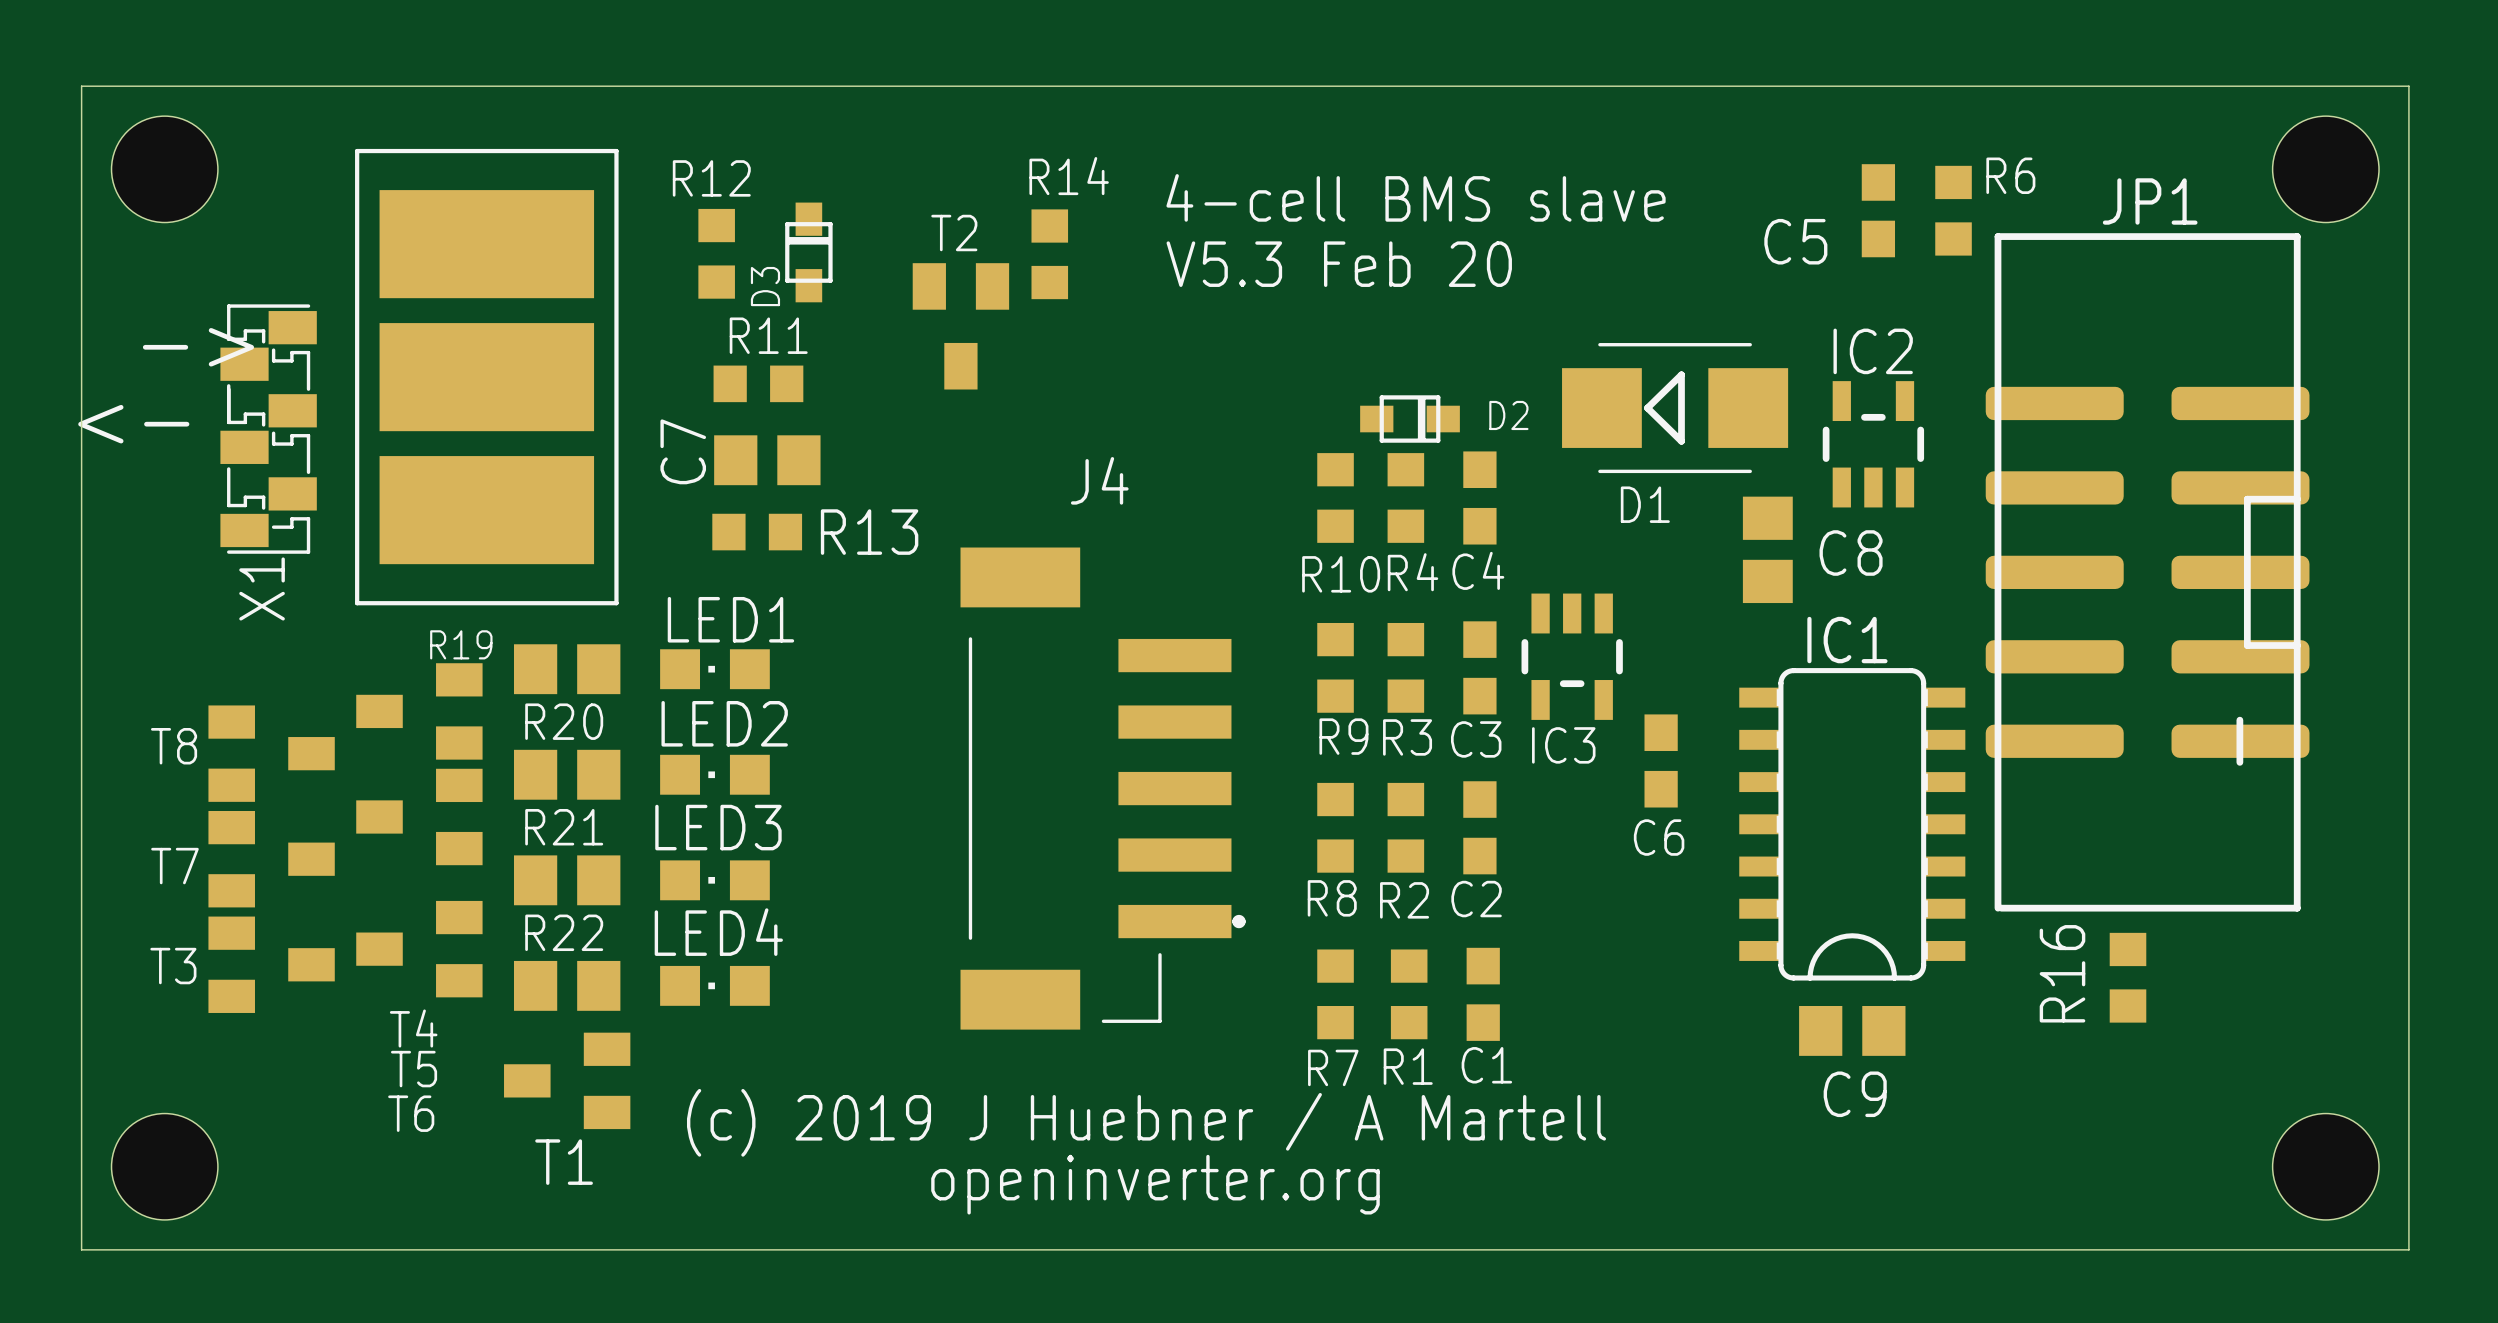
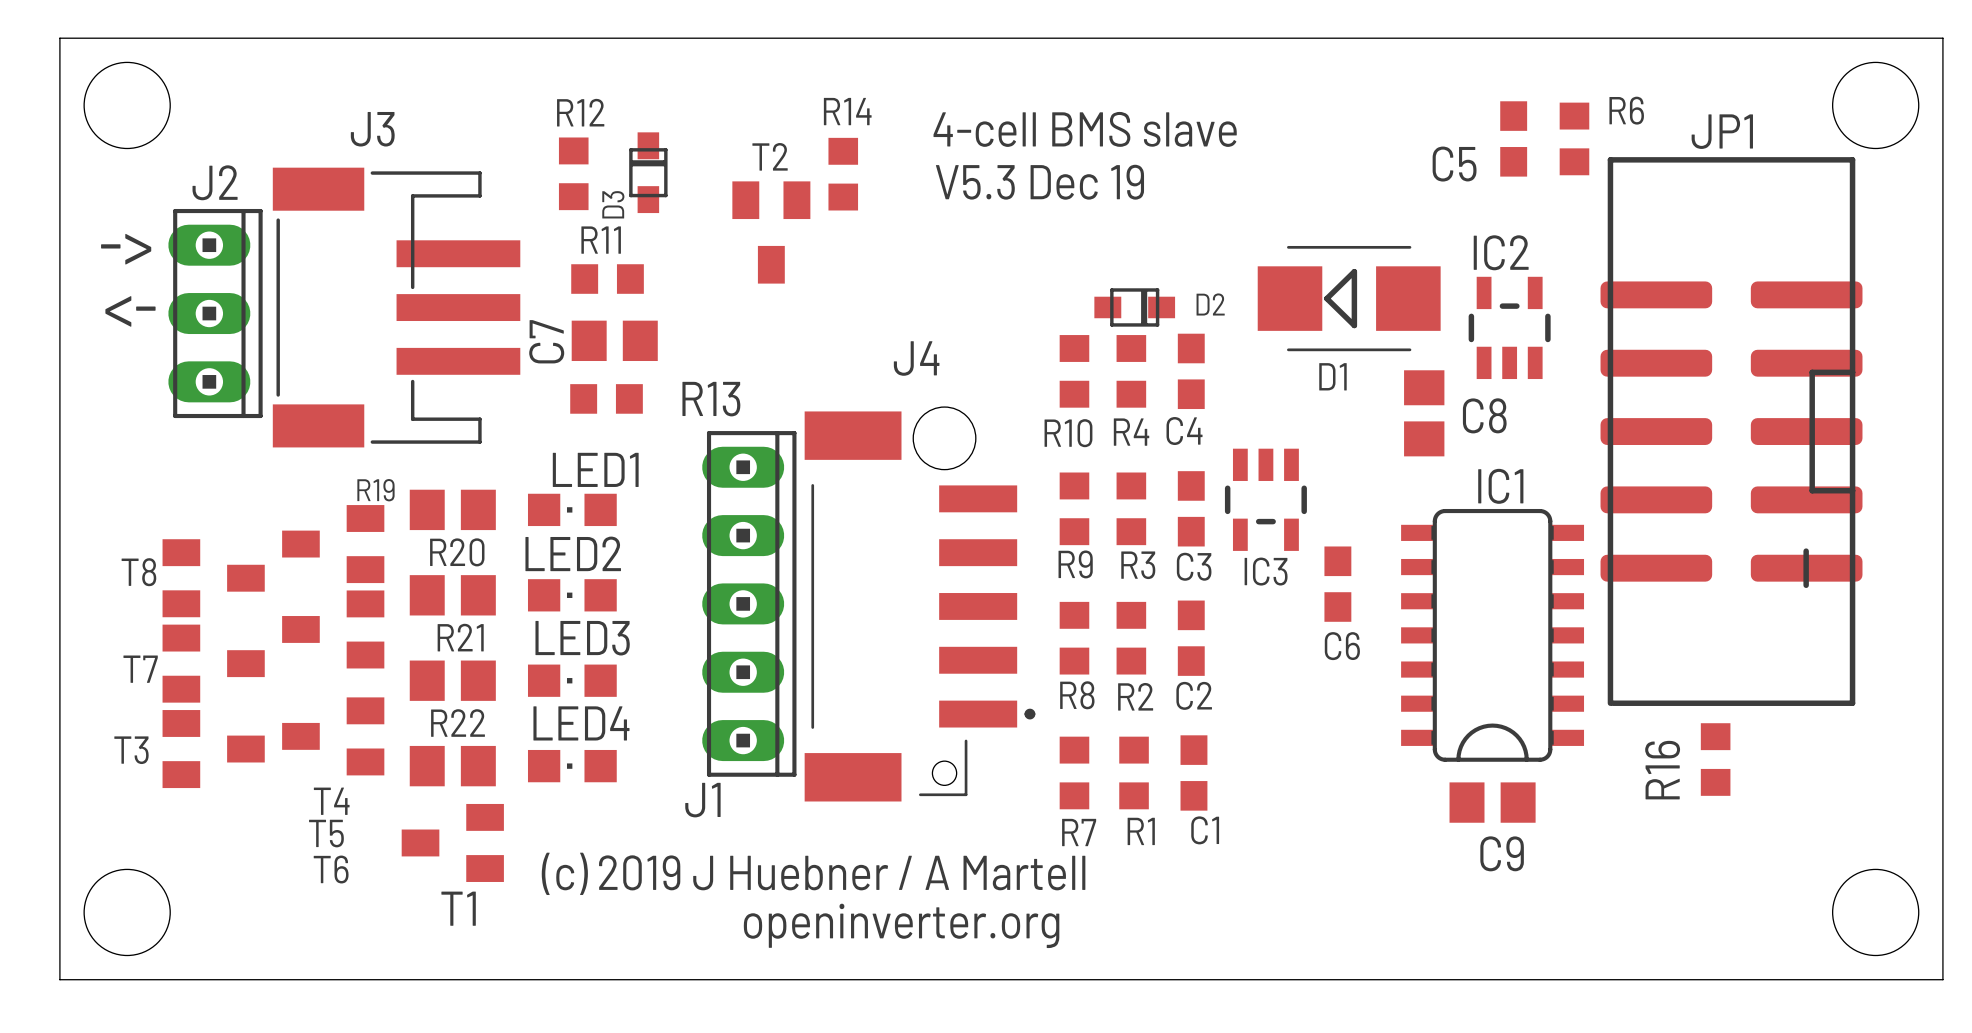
text: V5.3 Feb 20 (1339, 264) -> V5.3 Dec 19 (1039, 182)
part: (486, 377) -> none
J3: none -> (396, 307)
J2: none -> (215, 313)
X1: (268, 429) -> none
J4 footprint: [960, 547, 1246, 1030] -> [804, 407, 1036, 802]
J1: none -> (749, 603)

